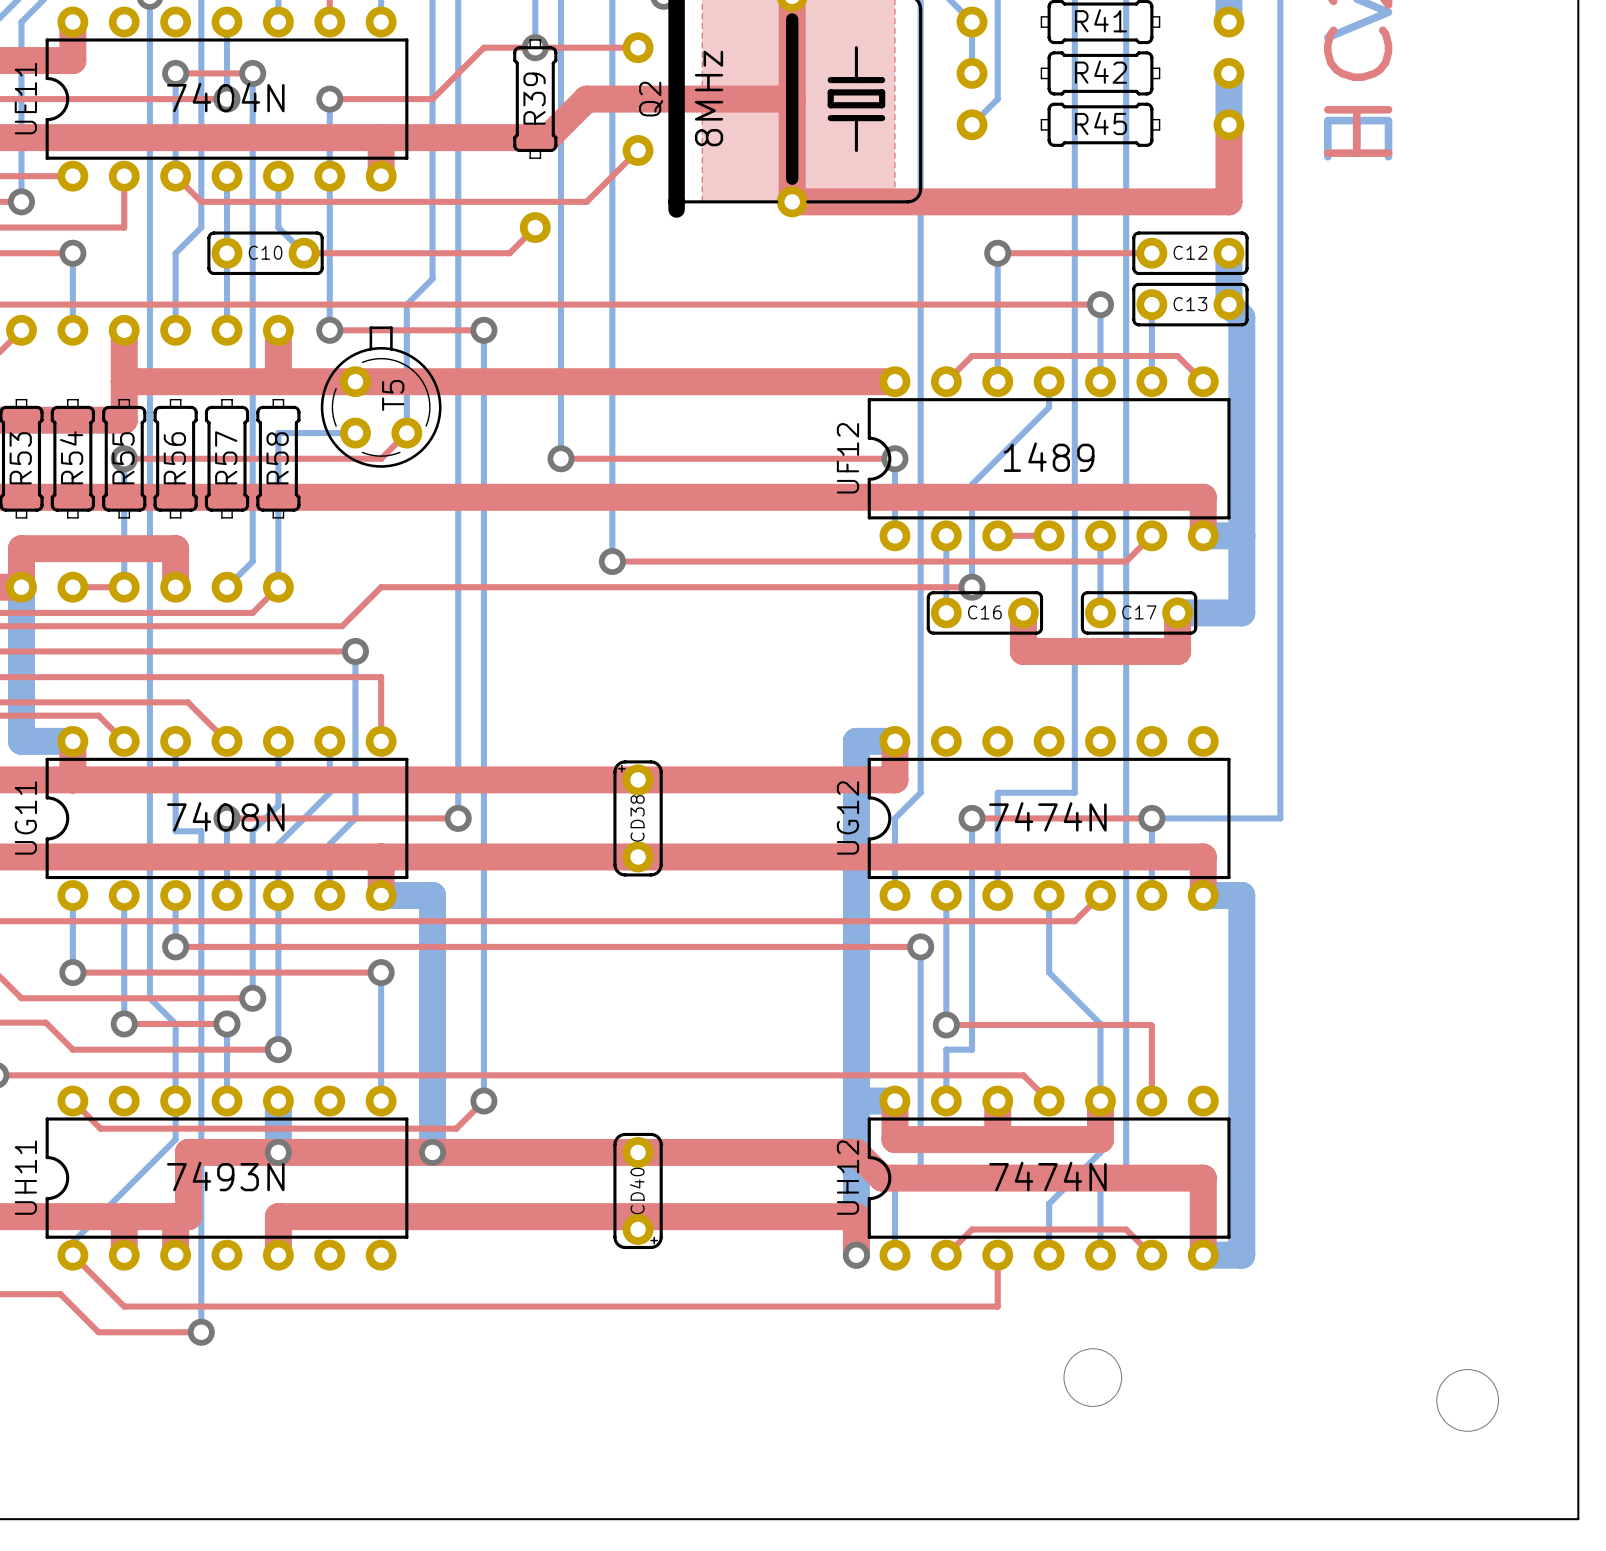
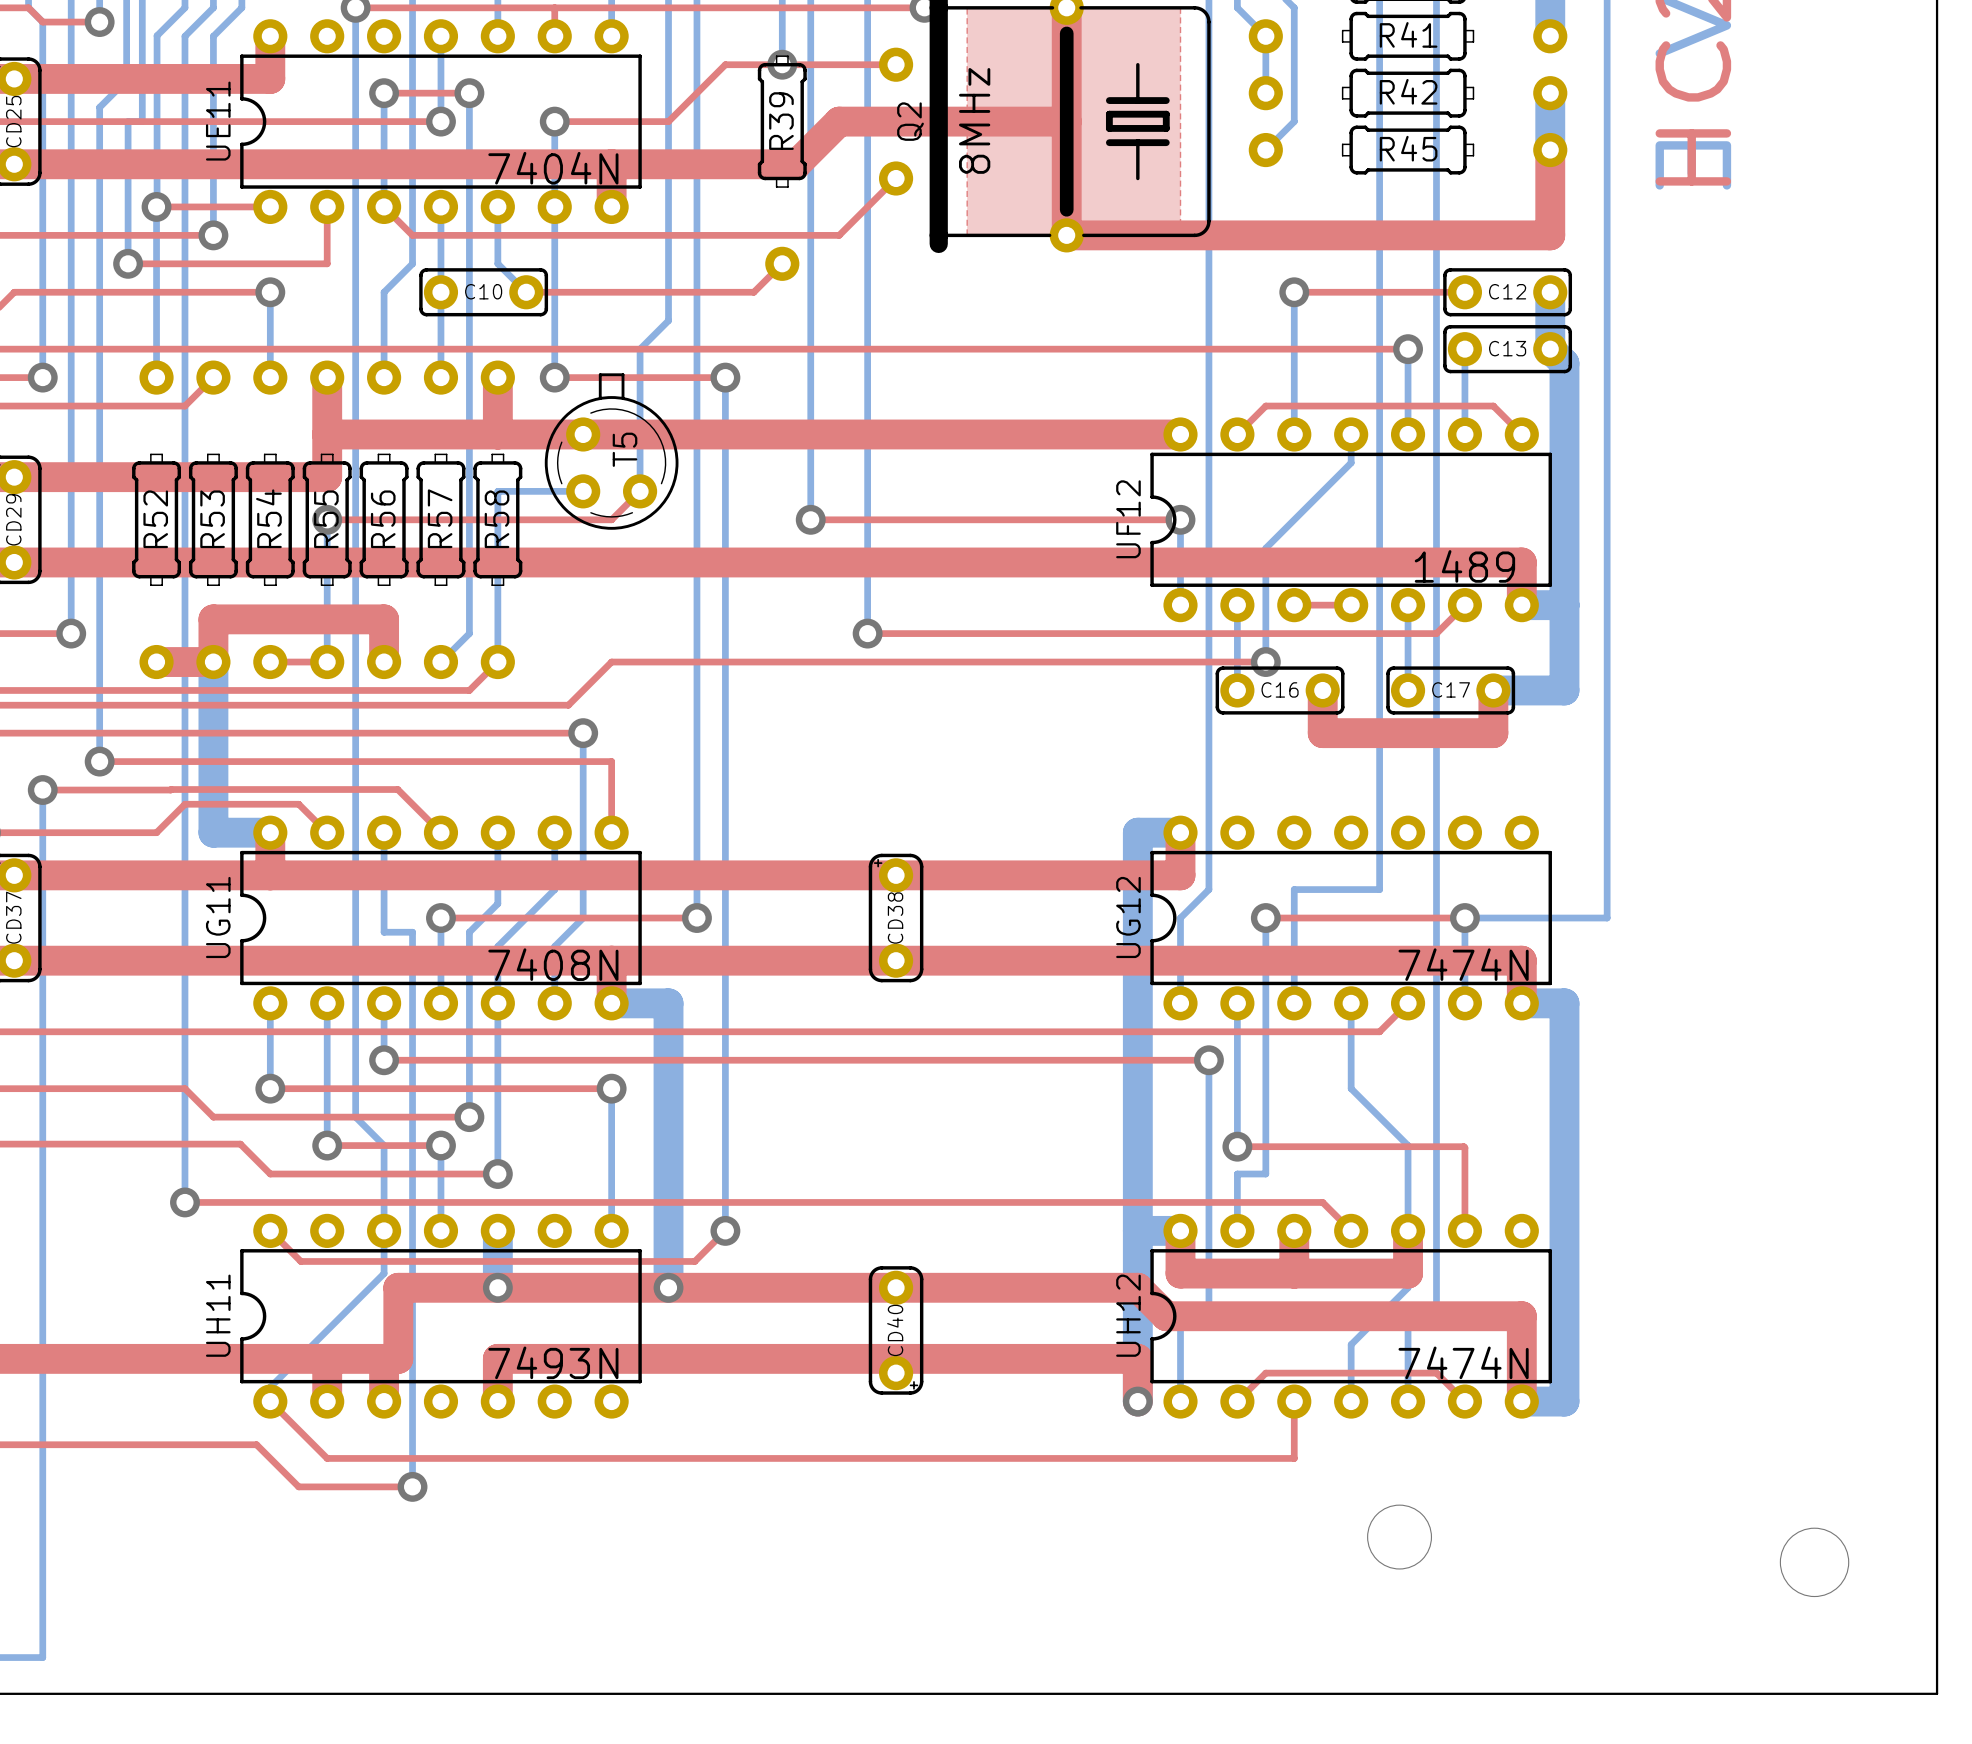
UE11 value position: 7404N (225, 97) -> 7404N (553, 168)
UF12 value position: 1489 (1049, 457) -> 1489 (1464, 566)
UG11 value position: 7408N (225, 816) -> 7408N (553, 964)
UG12 value position: 7474N (1047, 816) -> 7474N (1463, 964)
UH11 value position: 7493N (225, 1176) -> 7493N (553, 1362)
UH12 value position: 7474N (1047, 1176) -> 7474N (1463, 1362)

